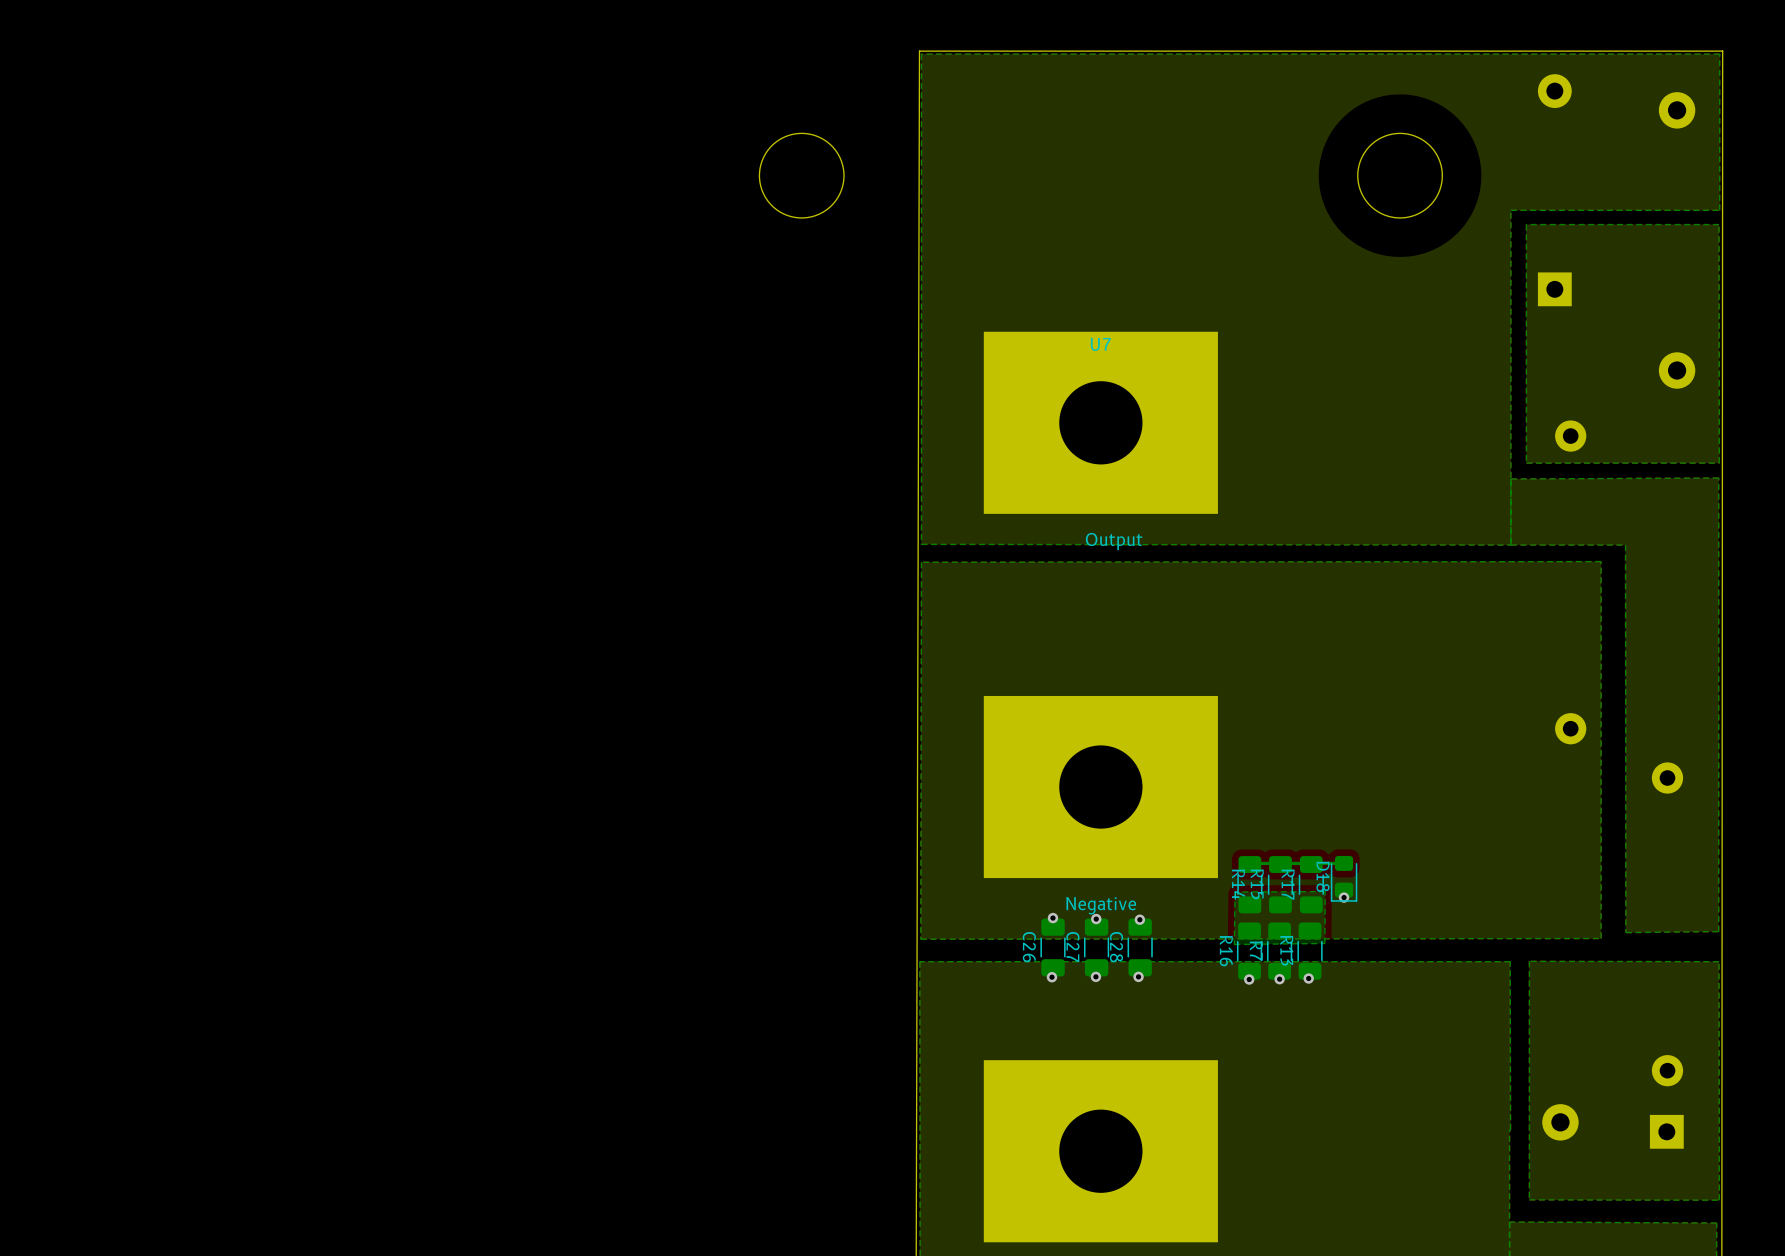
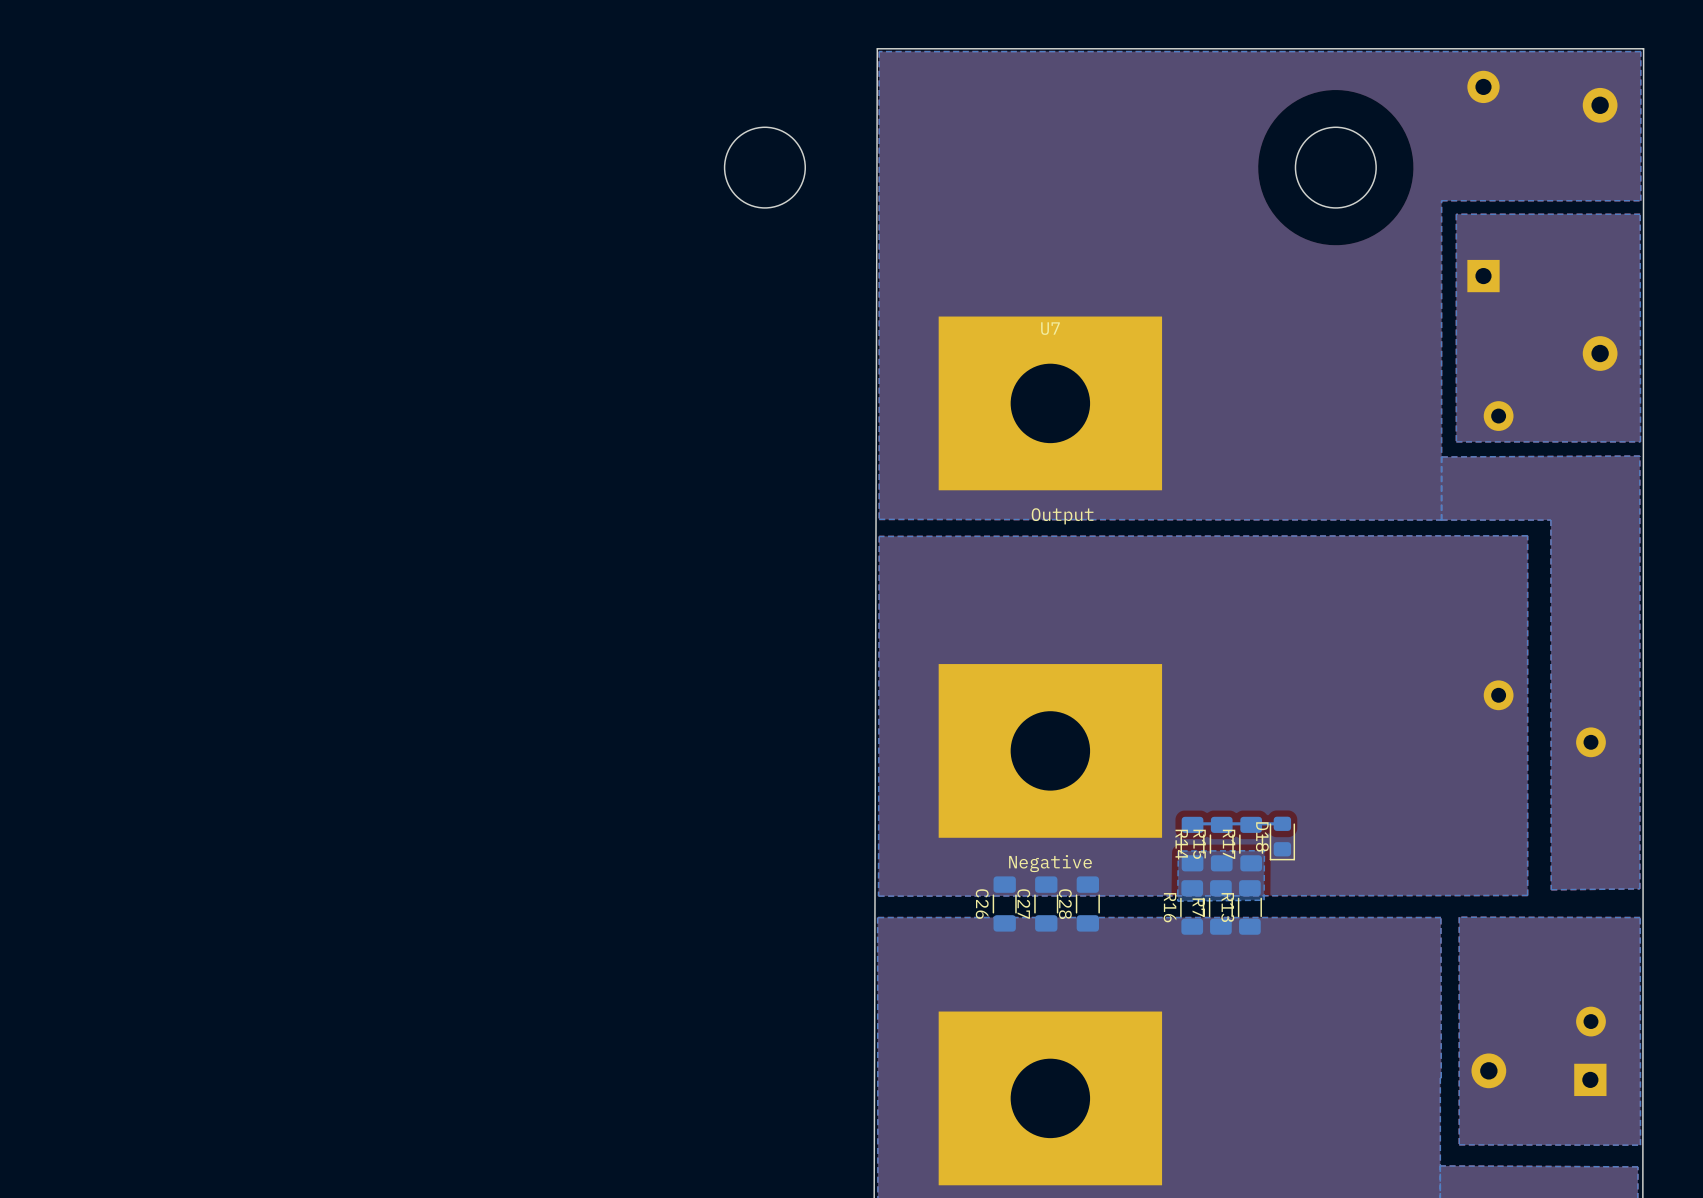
via: (1344, 897) -> none
via: (1052, 918) -> none
via: (1096, 919) -> none
via: (1139, 919) -> none
via: (1095, 976) -> none
via: (1138, 976) -> none
via: (1051, 977) -> none
via: (1308, 978) -> none
via: (1249, 979) -> none
via: (1279, 979) -> none

